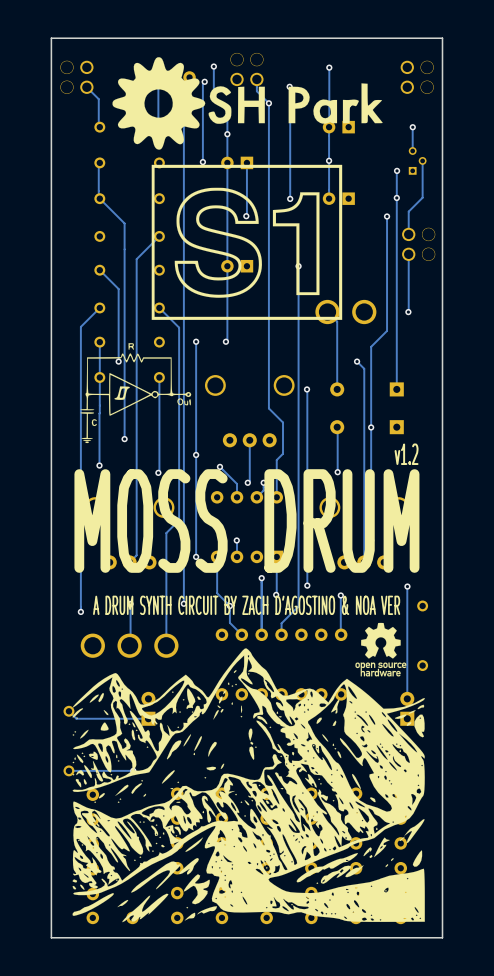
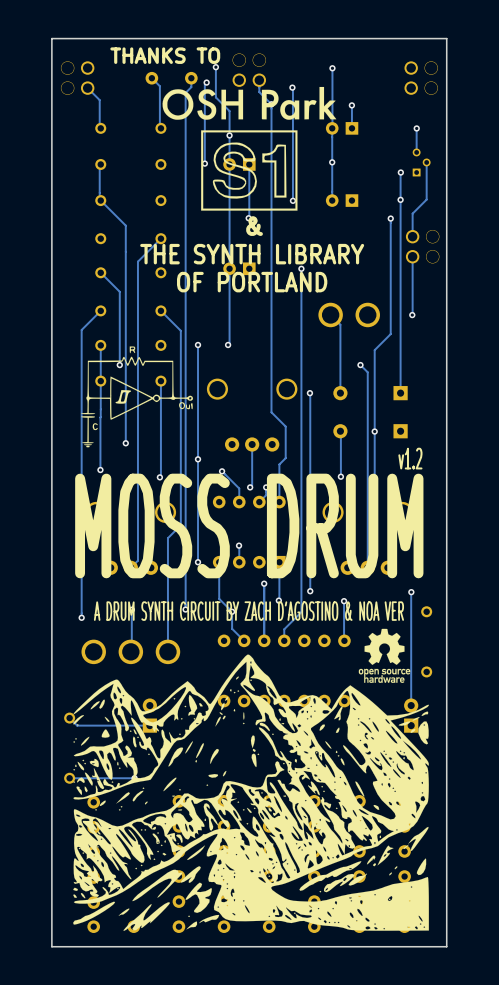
text: none -> THANKS TO (165, 55)
drawing shape: [112, 57, 383, 150] -> [162, 86, 337, 120]
drawing: none -> [201, 130, 298, 211]
drawing: [151, 164, 343, 320] -> none
text: none -> & (254, 226)
text: none -> THE SYNTH LIBRARY (252, 254)
text: none -> OF PORTLAND (252, 282)

